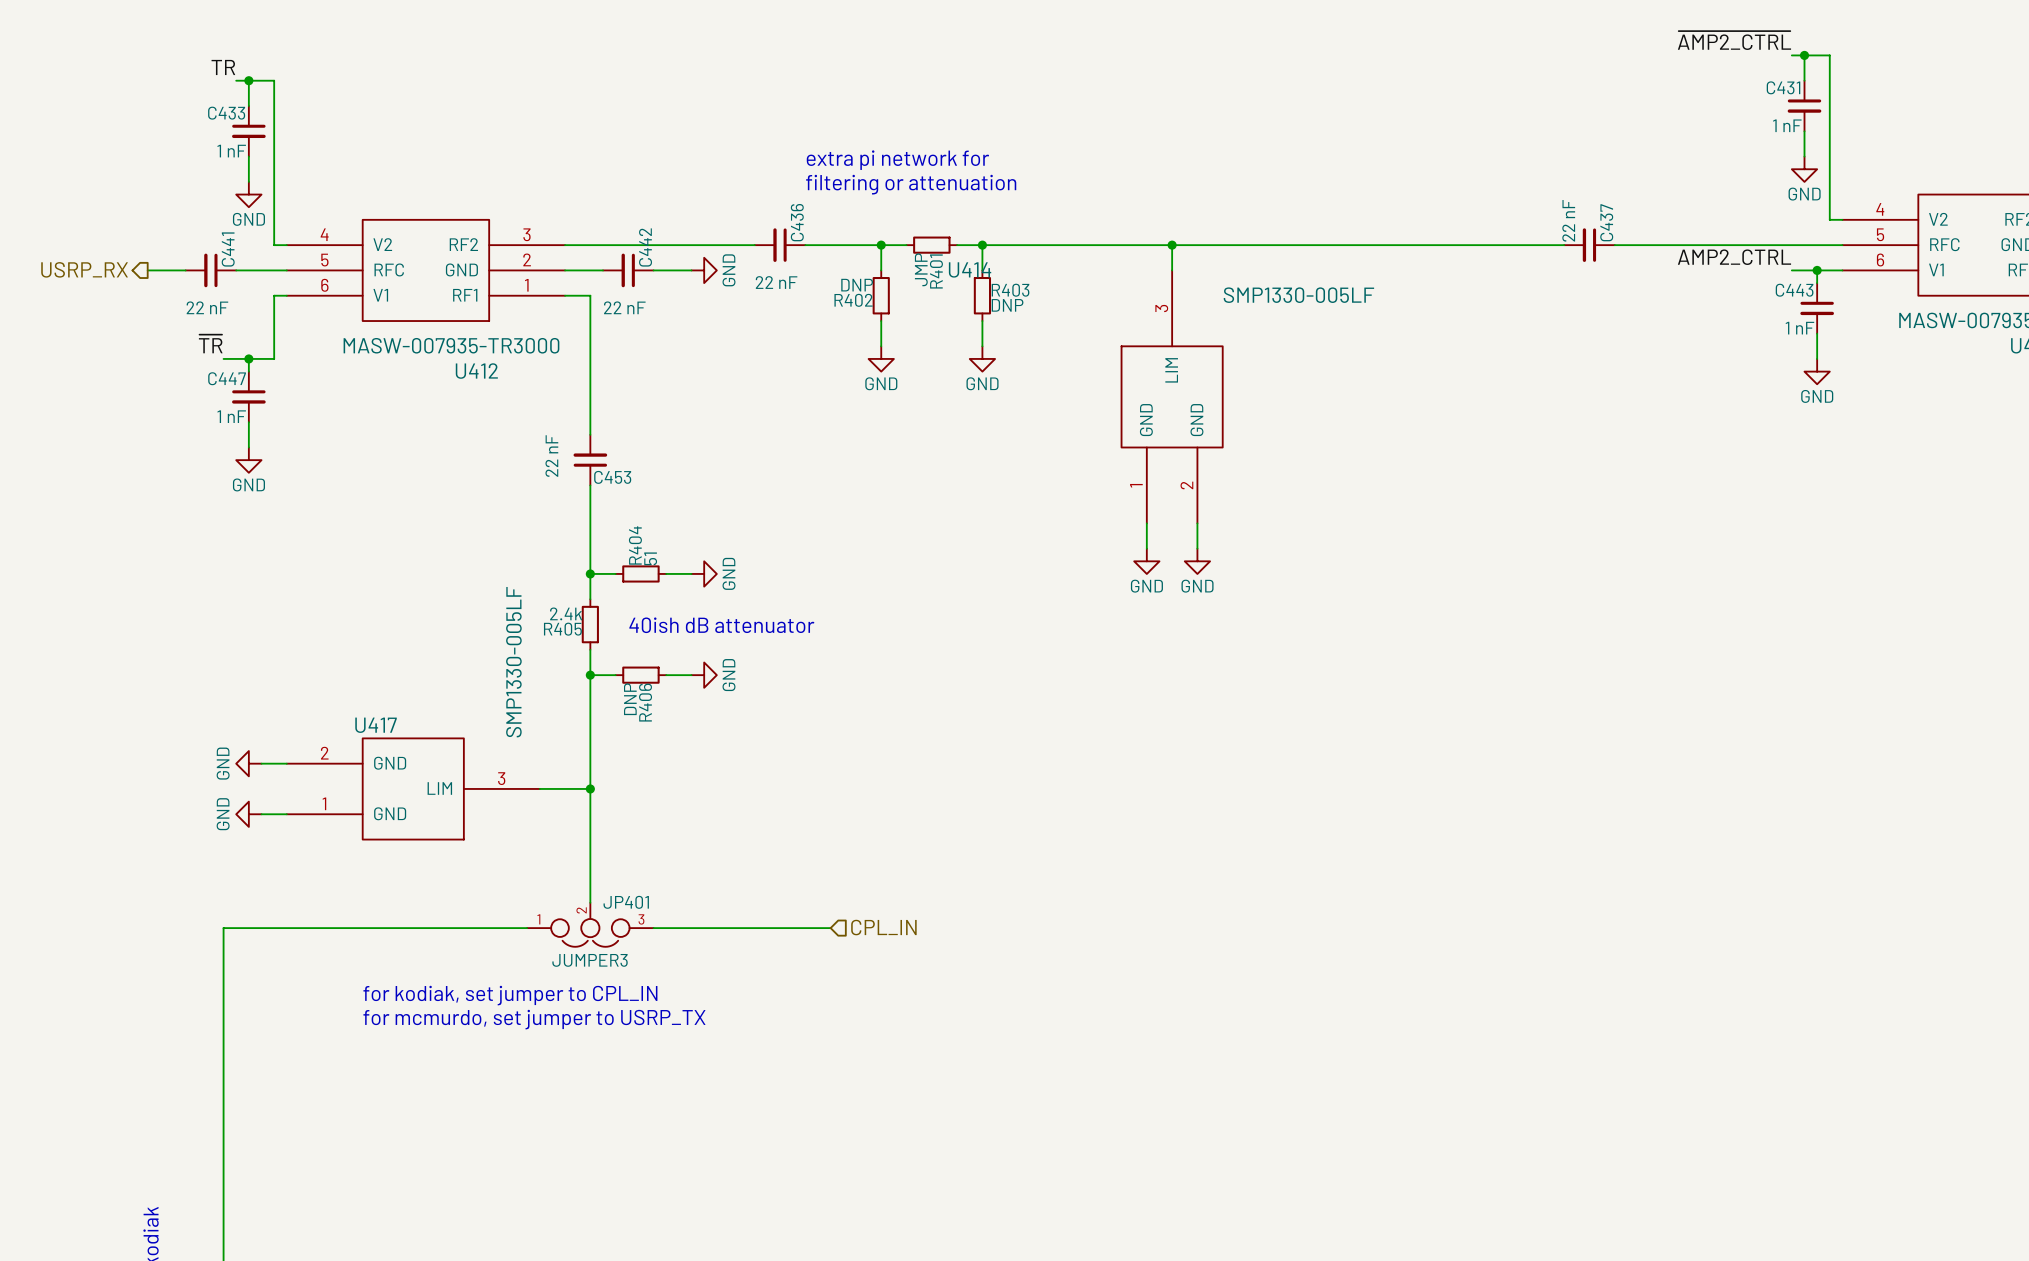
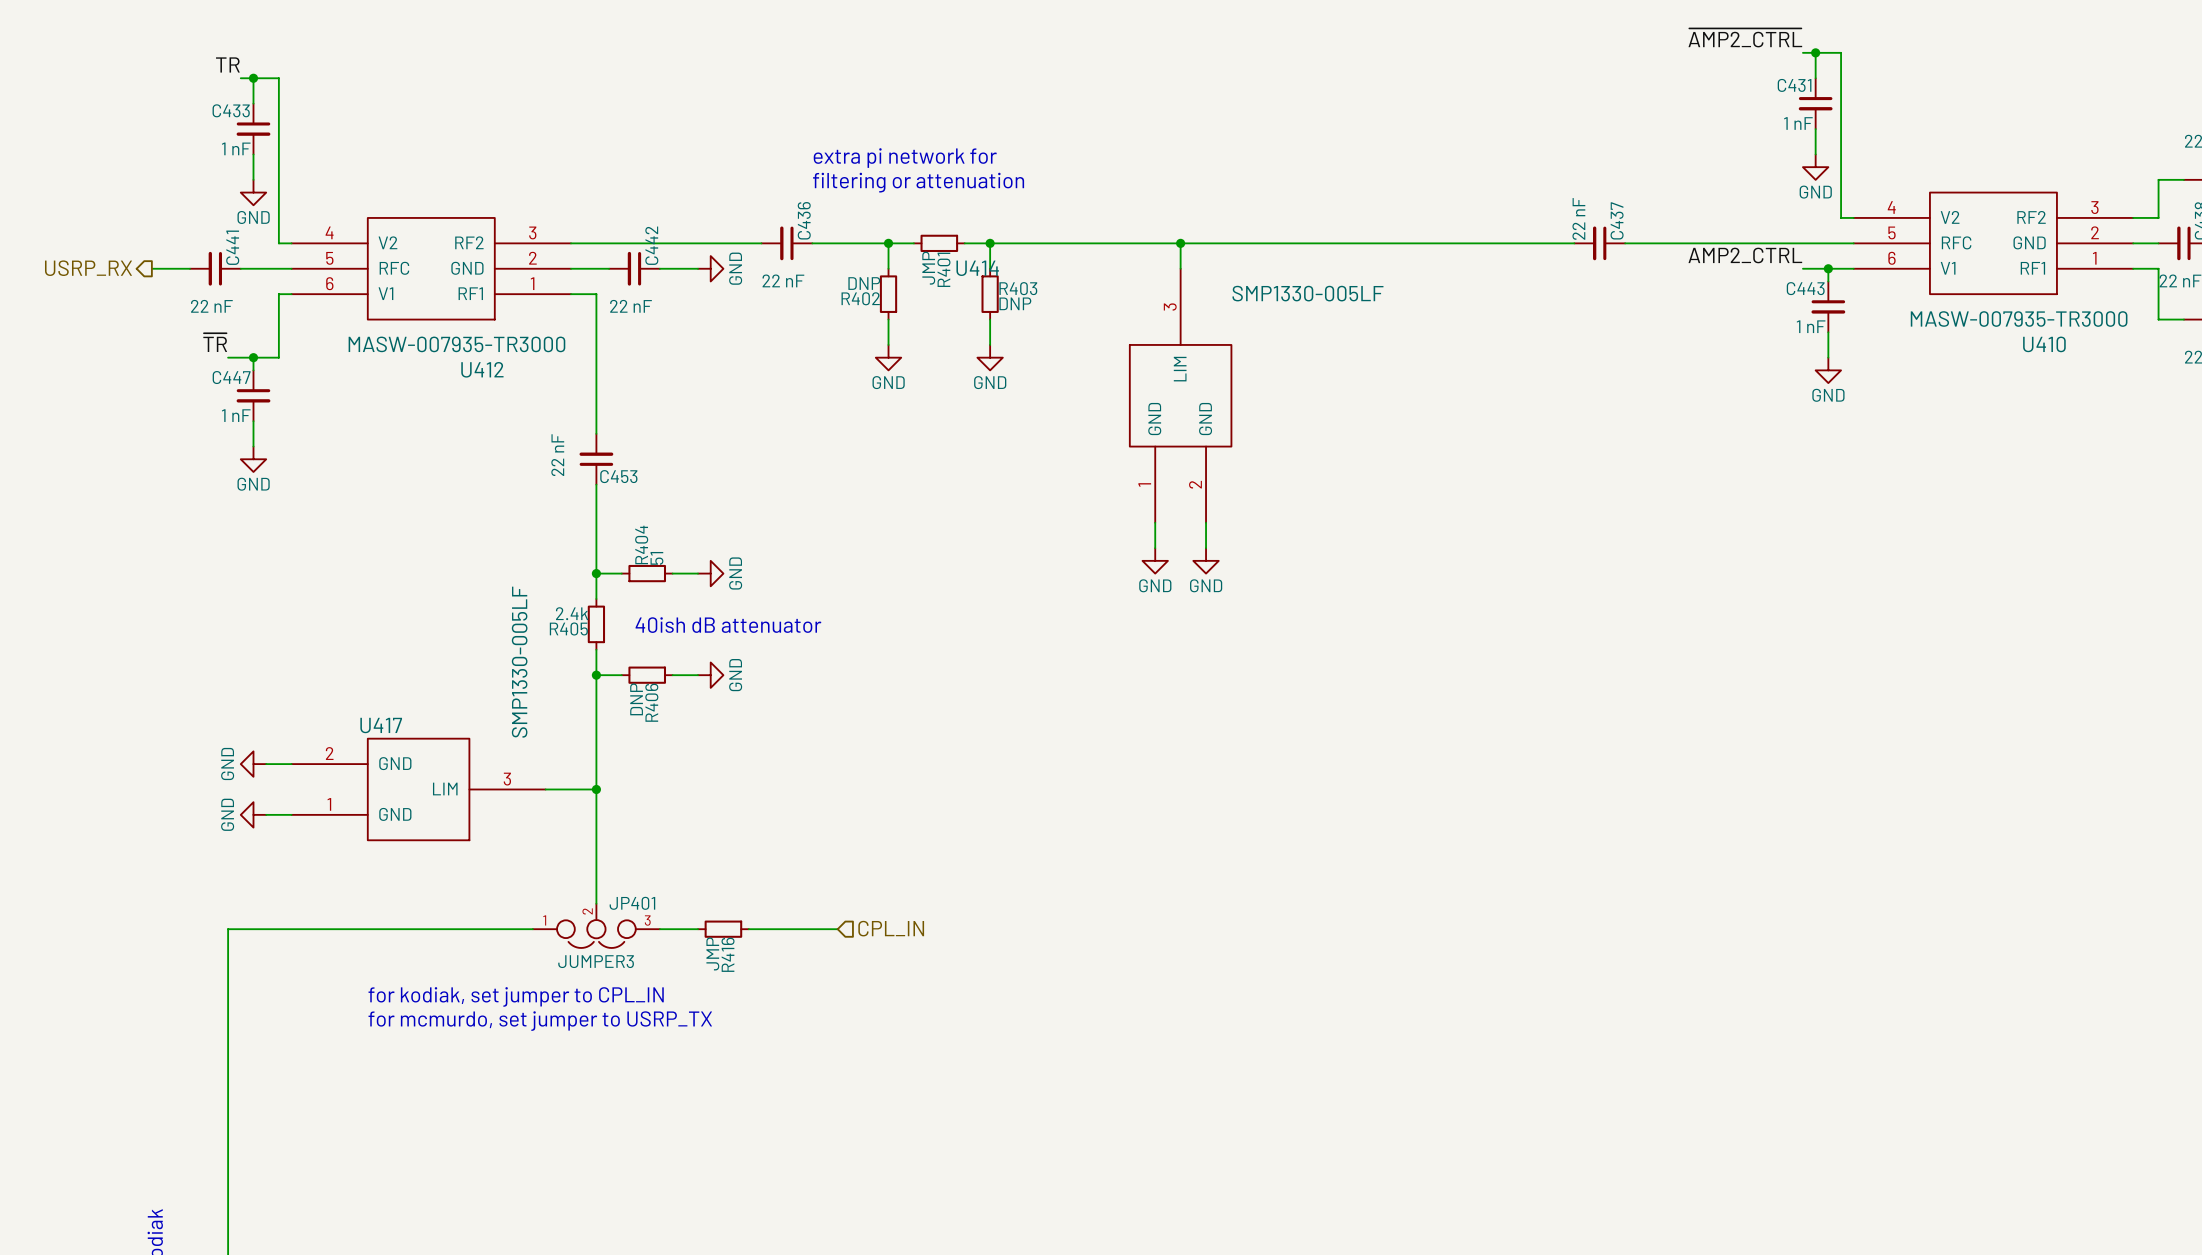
wire: (691, 928) (742, 928) -> none
R416: none -> JMP (723, 929)

